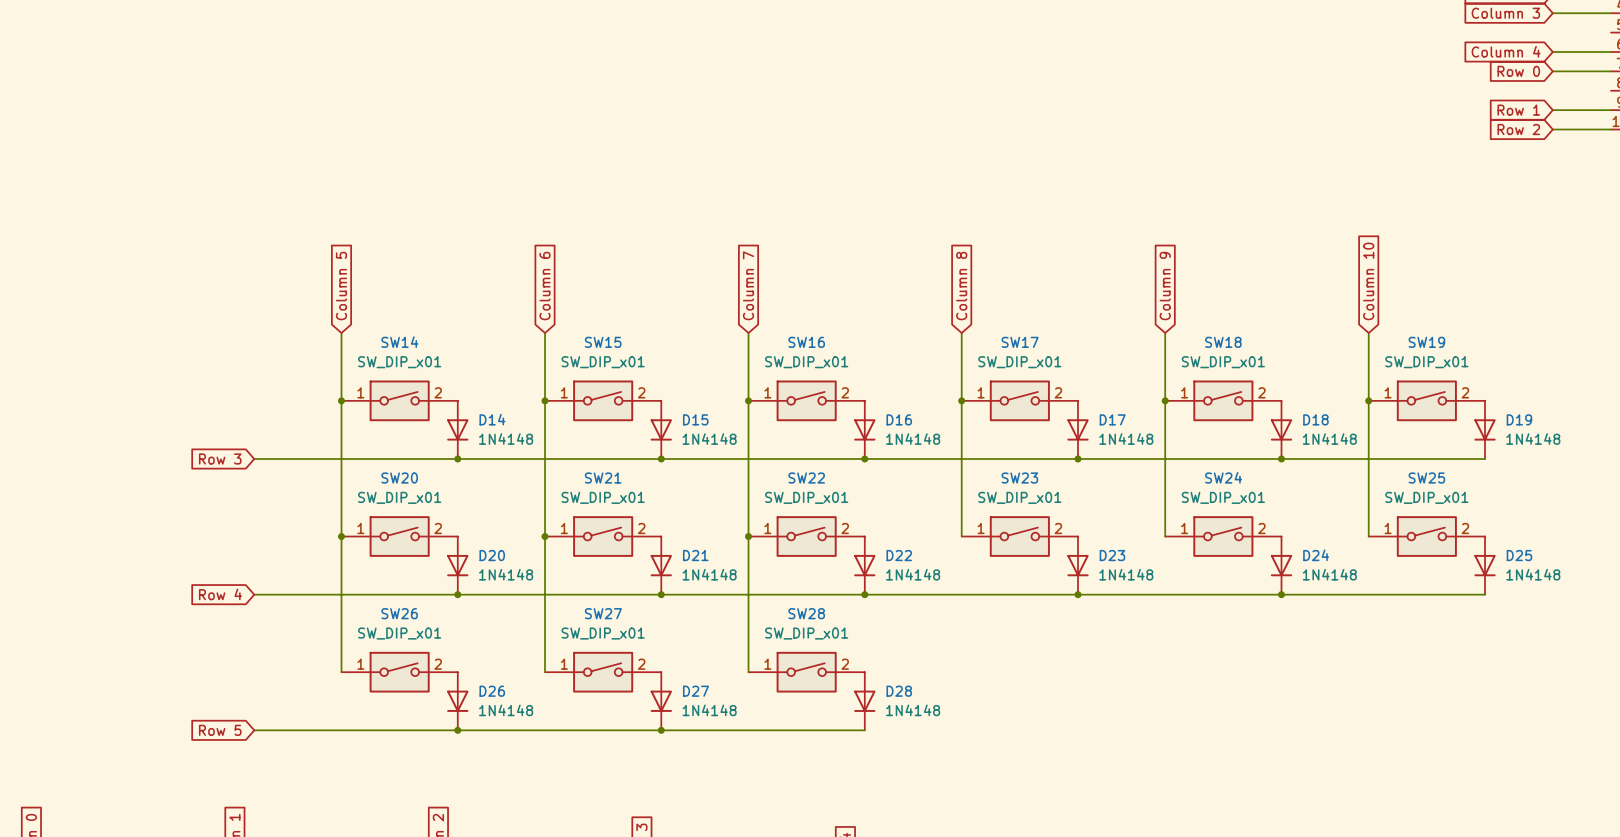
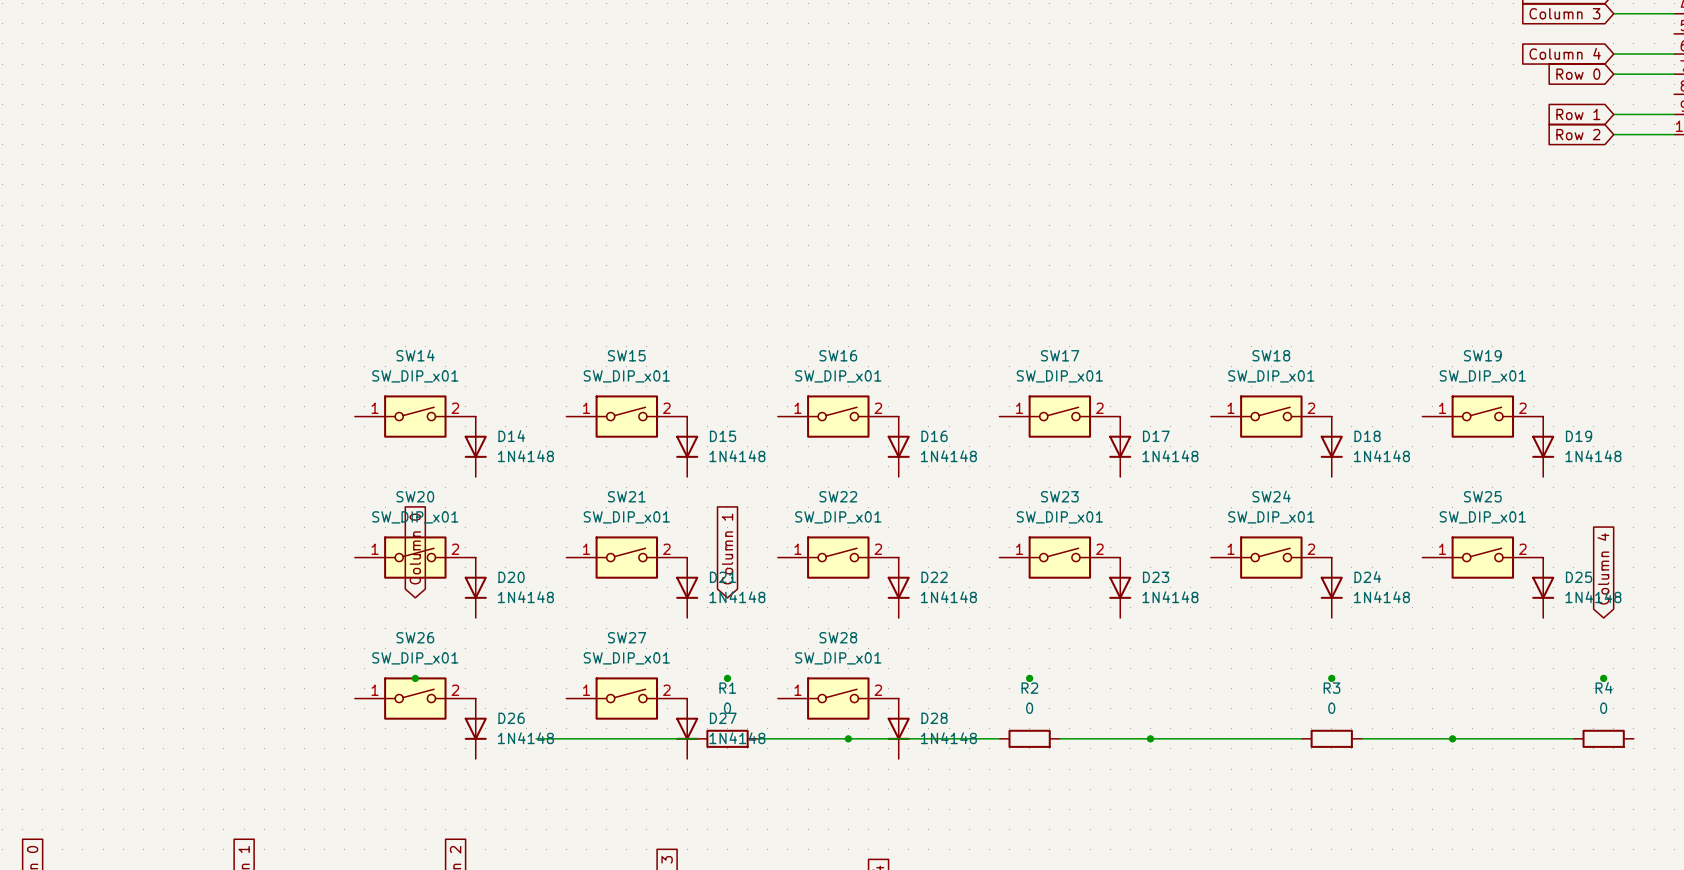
global label: Column 10 (1368, 281) -> none
global label: Column 7 (748, 285) -> none
global label: Column 5 (341, 286) -> none
global label: Column 6 (545, 286) -> none
global label: Column 8 (961, 286) -> none
global label: Column 9 (1165, 286) -> none
wire: (341, 333) (341, 672) -> none
wire: (545, 333) (545, 672) -> none
wire: (748, 333) (748, 672) -> none
wire: (961, 333) (961, 536) -> none
wire: (1165, 333) (1165, 536) -> none
wire: (1368, 333) (1368, 536) -> none
junction: (341, 400) -> none
junction: (545, 400) -> none
junction: (748, 400) -> none
junction: (961, 400) -> none
junction: (1165, 400) -> none
junction: (1368, 400) -> none
global label: Row 3 (220, 459) -> none
wire: (254, 459) (1485, 459) -> none
junction: (457, 459) -> none
junction: (661, 459) -> none
junction: (864, 459) -> none
junction: (1077, 459) -> none
junction: (1281, 459) -> none
global label: none -> Column 0 (415, 549)
global label: none -> Column 1 (727, 549)
junction: (341, 536) -> none
junction: (545, 536) -> none
junction: (748, 536) -> none
global label: none -> Column 4 (1603, 568)
global label: Row 4 (220, 594) -> none
wire: (254, 594) (1485, 594) -> none
junction: (457, 594) -> none
junction: (661, 594) -> none
junction: (864, 594) -> none
junction: (1077, 594) -> none
junction: (1281, 594) -> none
junction: none -> (415, 678)
junction: none -> (727, 678)
junction: none -> (1029, 678)
junction: none -> (1331, 678)
junction: none -> (1603, 678)
wire: none -> (536, 738) (697, 738)
R1: none -> 0 (727, 738)
wire: none -> (757, 738) (999, 738)
junction: none -> (848, 738)
R2: none -> 0 (1029, 738)
wire: none -> (1059, 738) (1301, 738)
junction: none -> (1150, 738)
R3: none -> 0 (1331, 738)
wire: none -> (1361, 738) (1573, 738)
junction: none -> (1452, 738)
R4: none -> 0 (1603, 738)
global label: Row 5 (220, 730) -> none
wire: (254, 730) (864, 730) -> none
junction: (457, 730) -> none
junction: (661, 730) -> none

